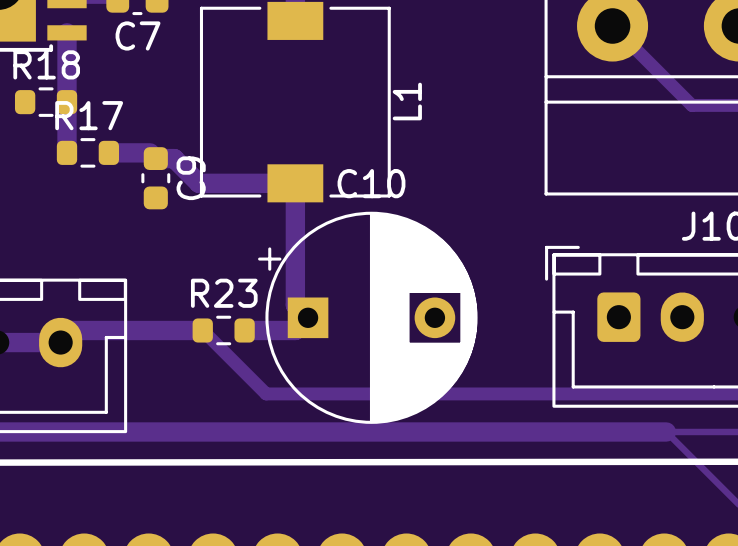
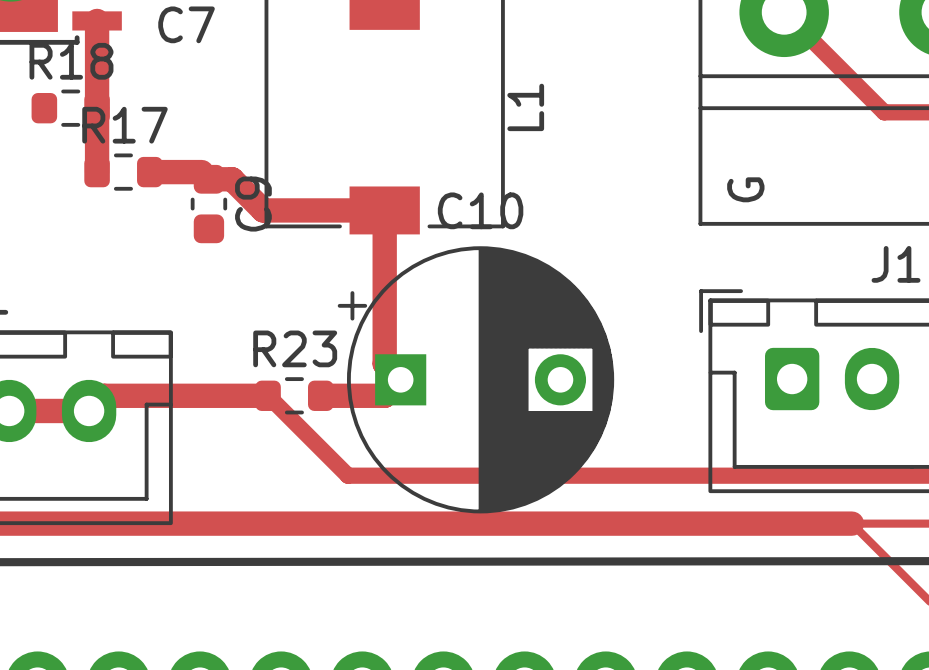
text: none -> G (745, 189)

